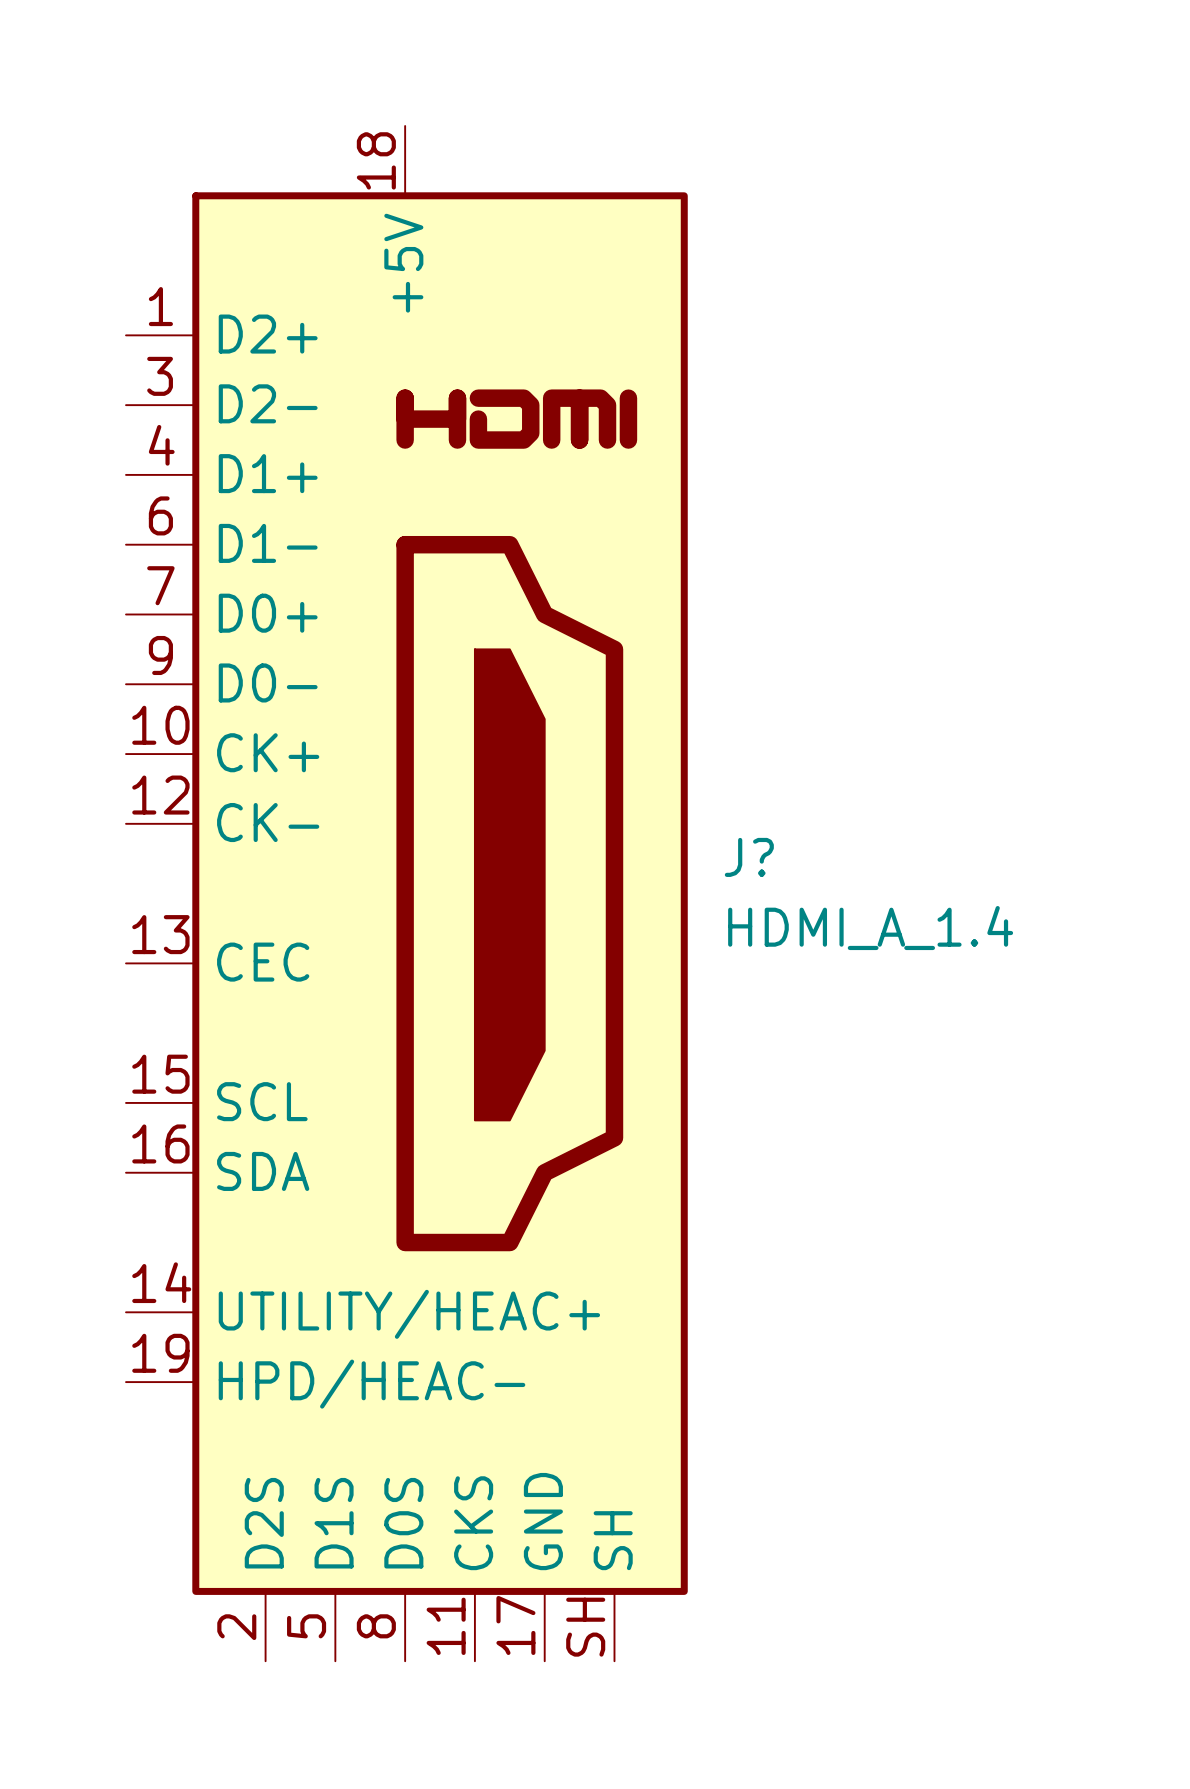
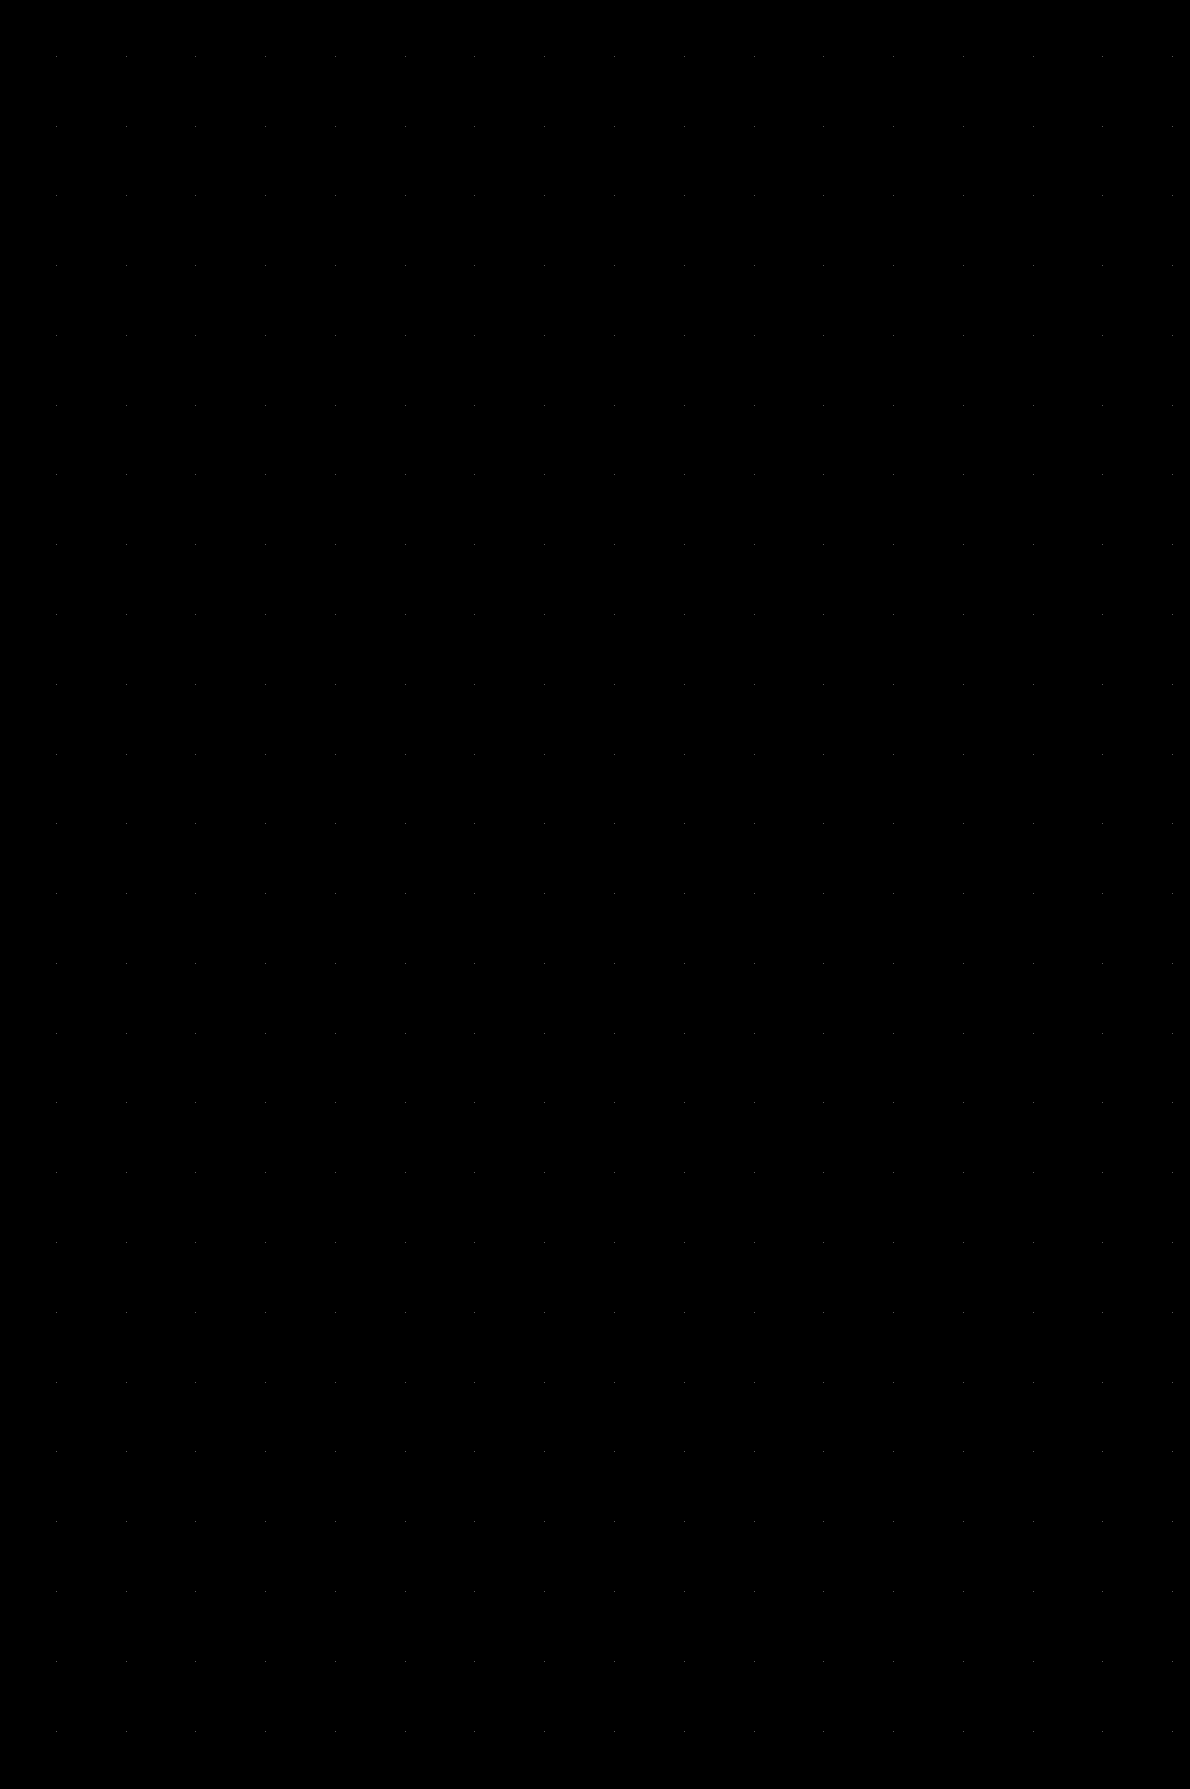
J?: HDMI_A_1.4 (406, 893) -> none

